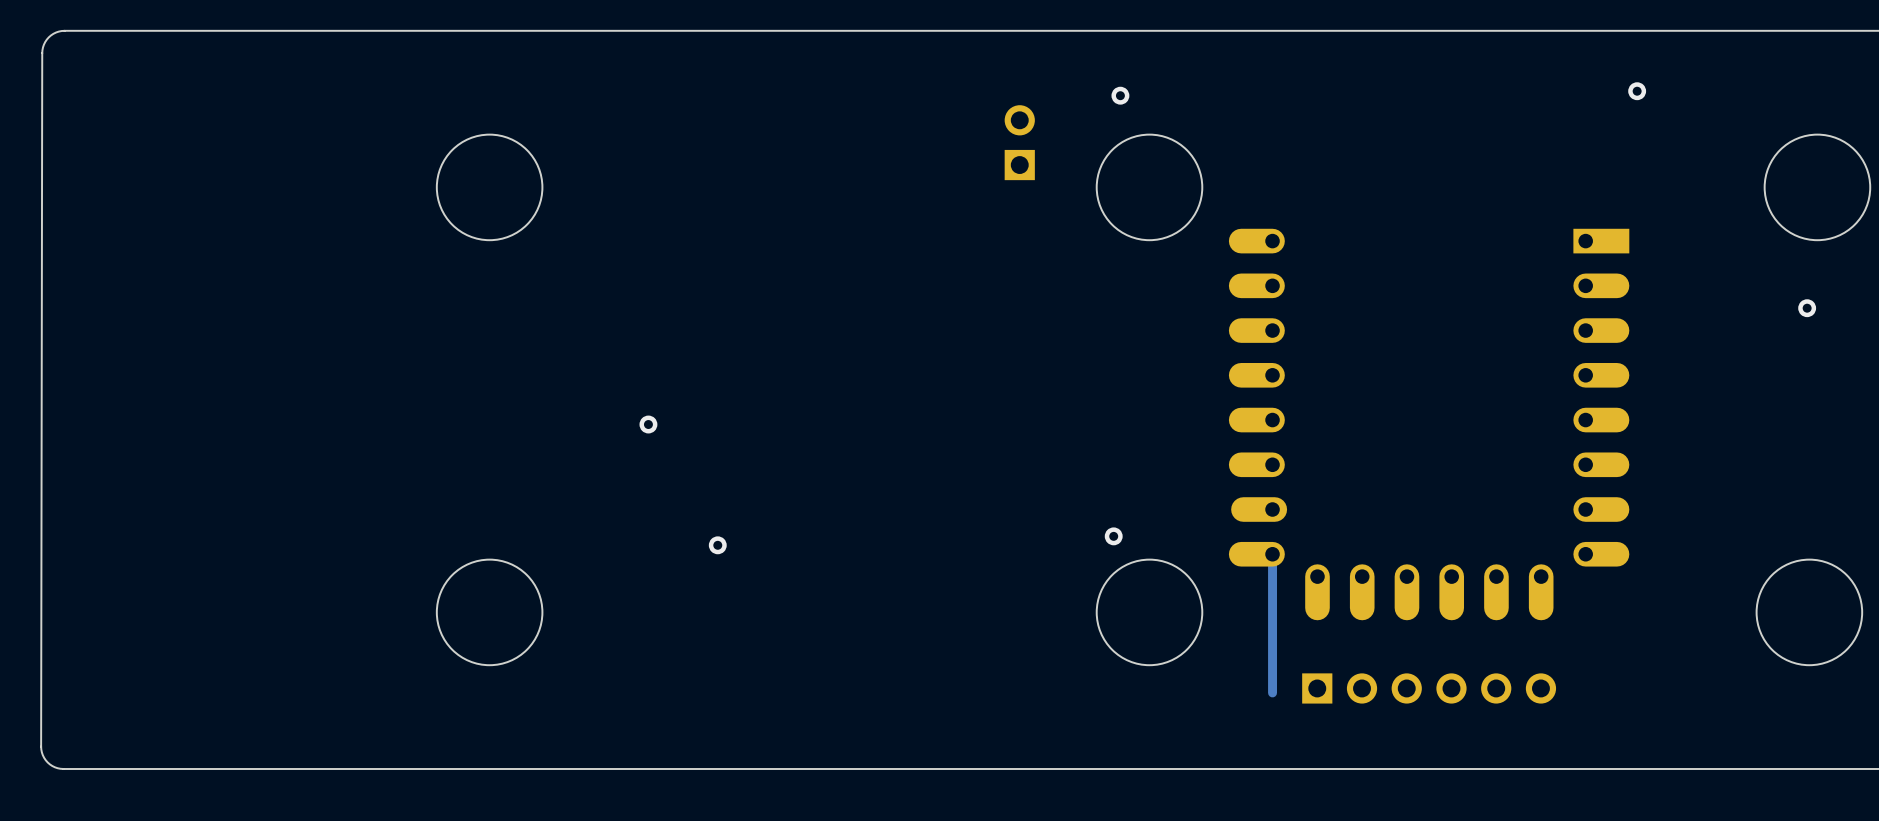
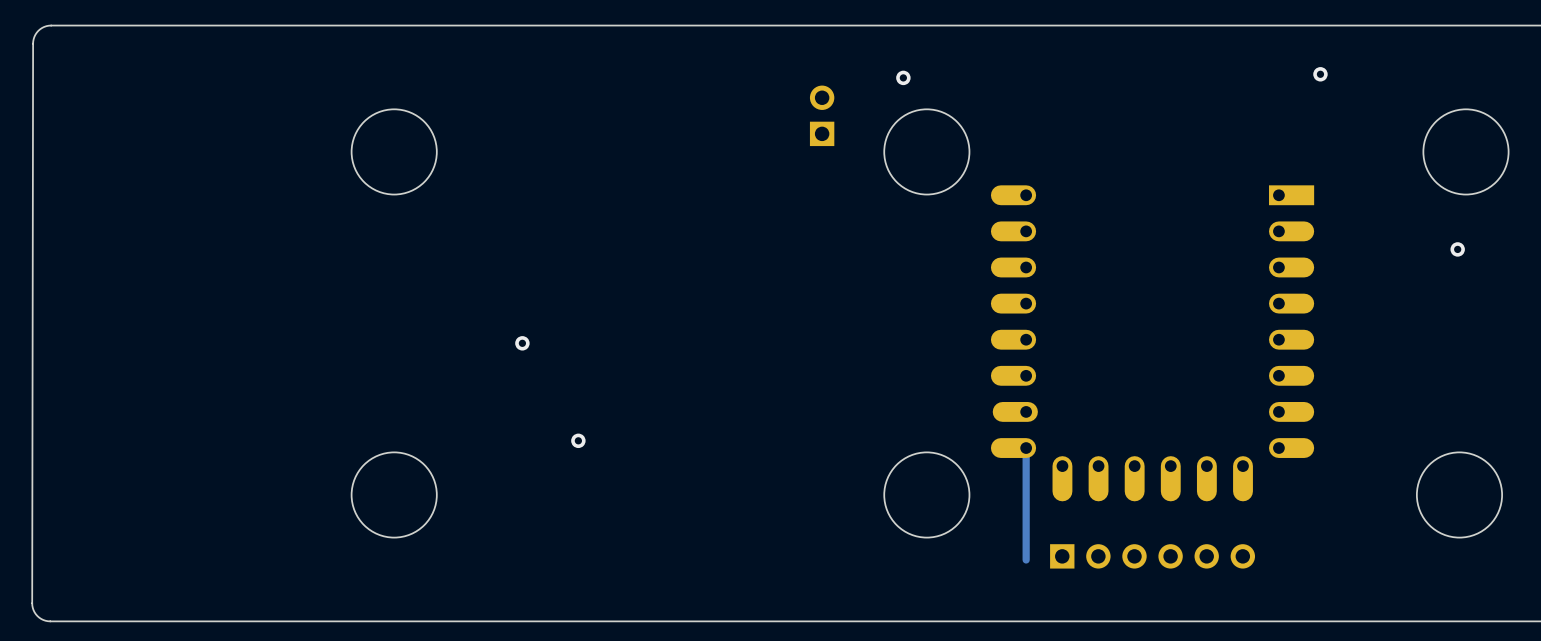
via: (1113, 536) -> none

